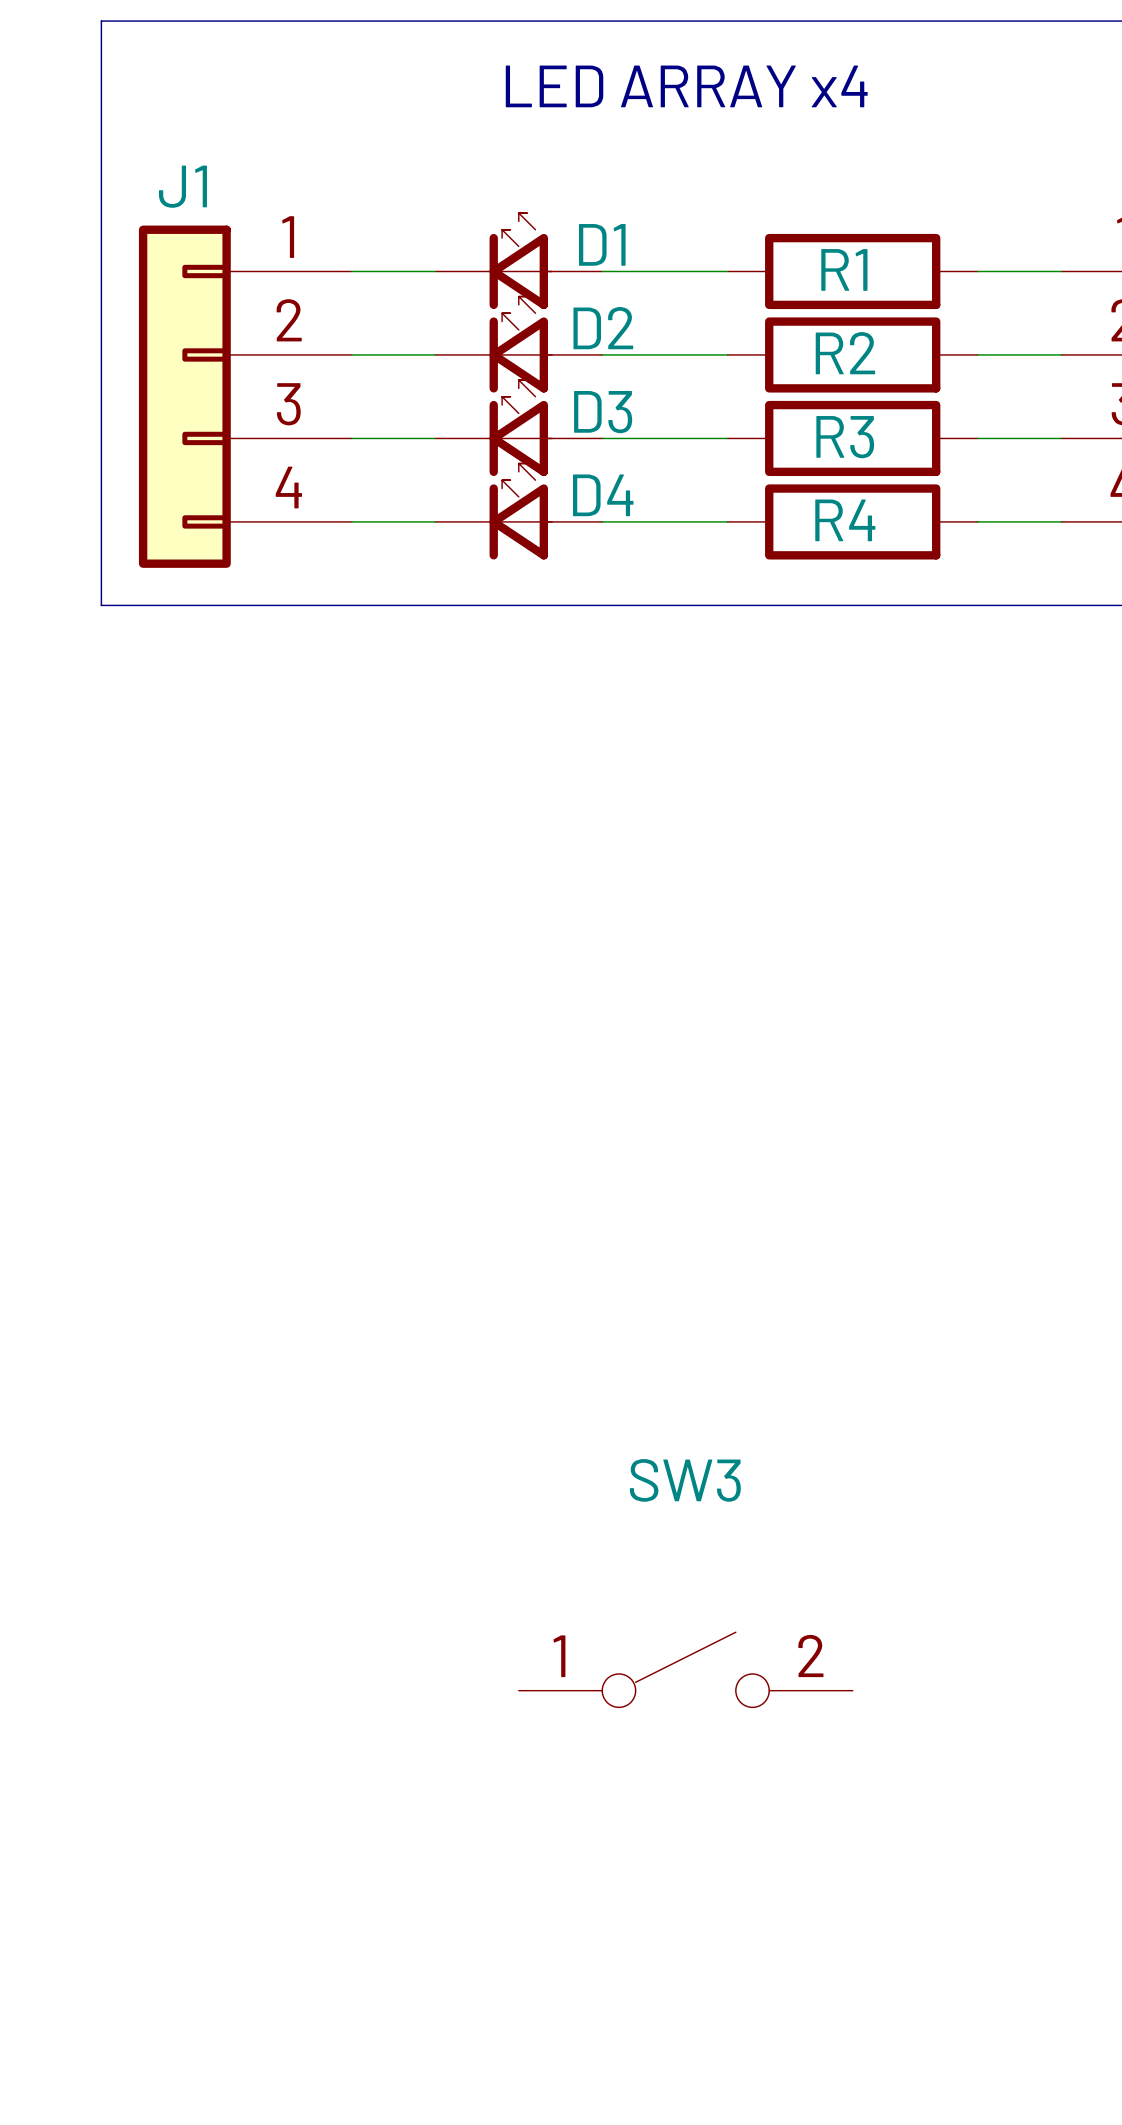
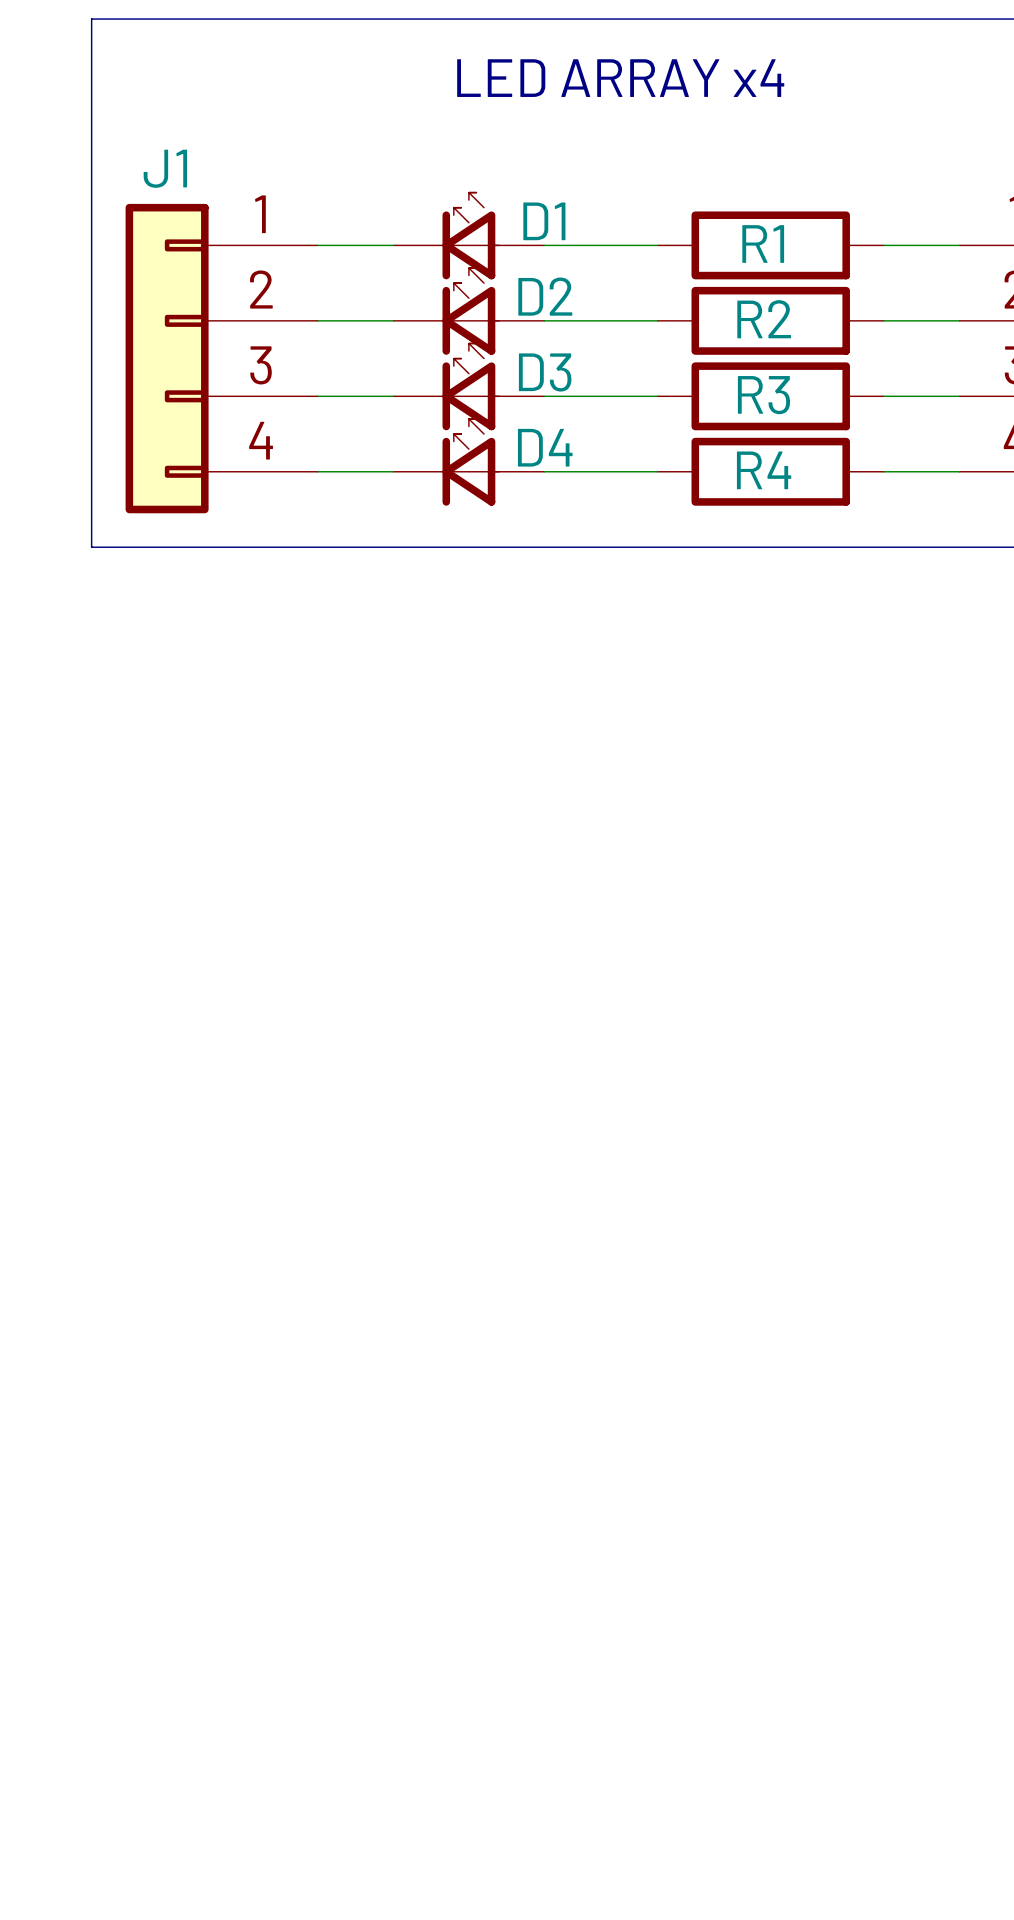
SW3: (685, 1669) -> none

